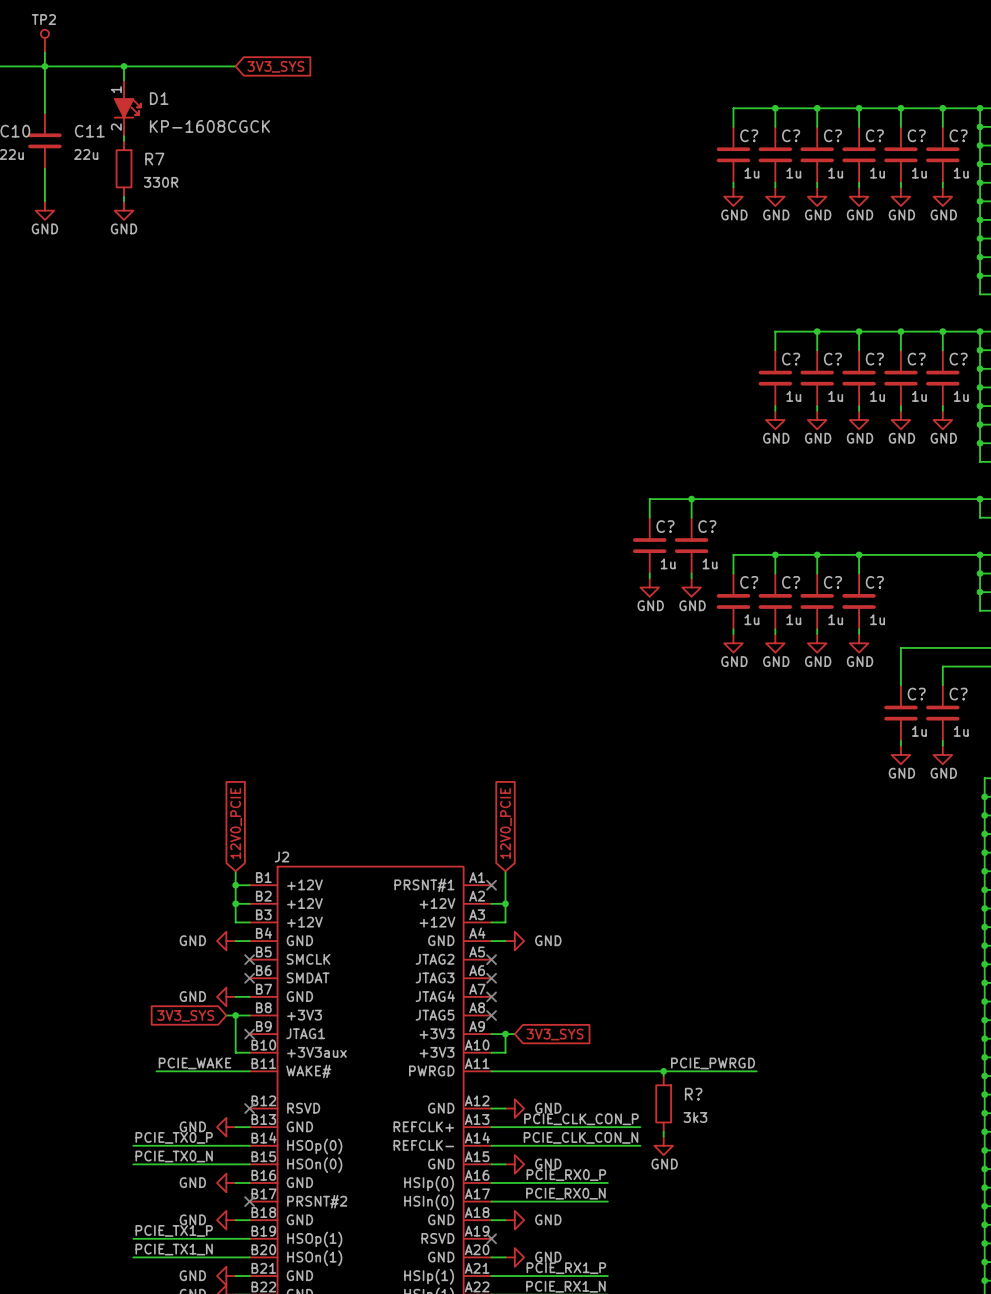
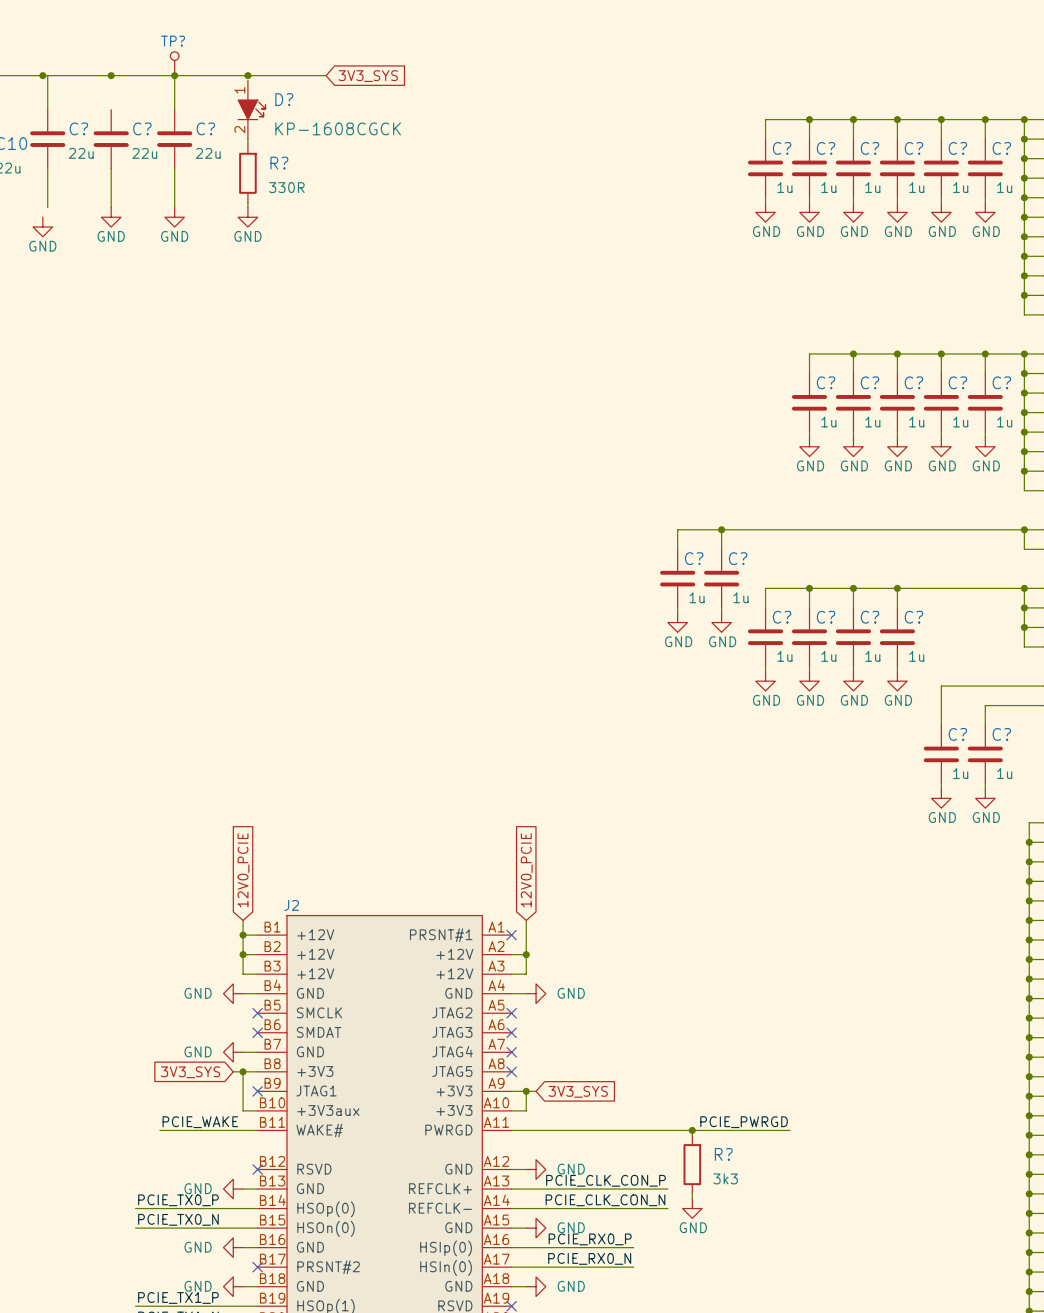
TP2: (44, 41) -> none
wire: (44, 52) (44, 112) -> none
TP?: none -> (174, 63)
wire: (124, 66) (124, 80) -> none
junction position: (124, 66) -> (111, 75)
wire: none -> (174, 75) (174, 109)
junction: none -> (174, 75)
wire: none -> (243, 75) (326, 75)
junction: none -> (247, 75)
global label position: 3V3_SYS (275, 66) -> 3V3_SYS (368, 76)
D?: none -> KP-1608CGCK (251, 109)
D1: KP-1608CGCK (127, 108) -> none
C?: none -> (47, 139)
C?: none -> (111, 139)
C?: none -> (174, 139)
C11: (44, 140) -> none
wire: none -> (47, 168) (47, 207)
wire: none -> (111, 168) (111, 207)
wire: none -> (174, 168) (174, 207)
R?: none -> (247, 173)
wire: (44, 168) (44, 201) -> (47, 75) (47, 109)
R7: (124, 168) -> none
wire: (124, 196) (124, 201) -> (247, 202) (247, 207)
power symbol: none -> GND (174, 217)
power symbol: none -> GND (247, 217)
power symbol position: GND (124, 210) -> GND (111, 217)

